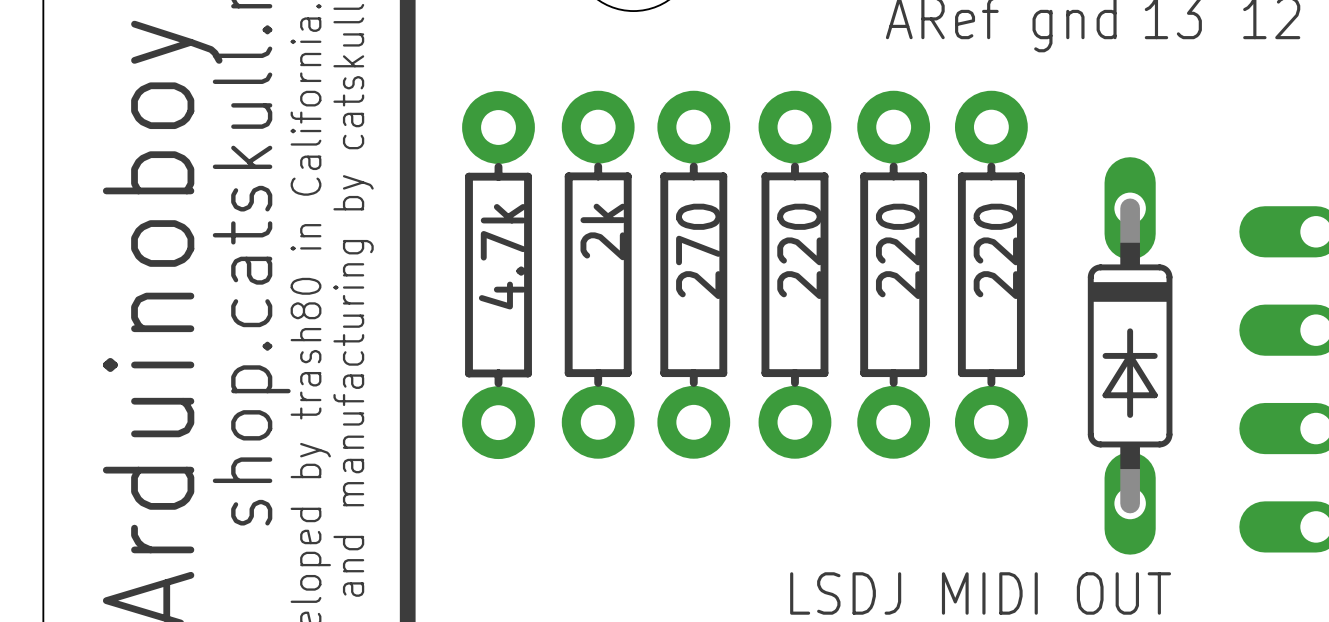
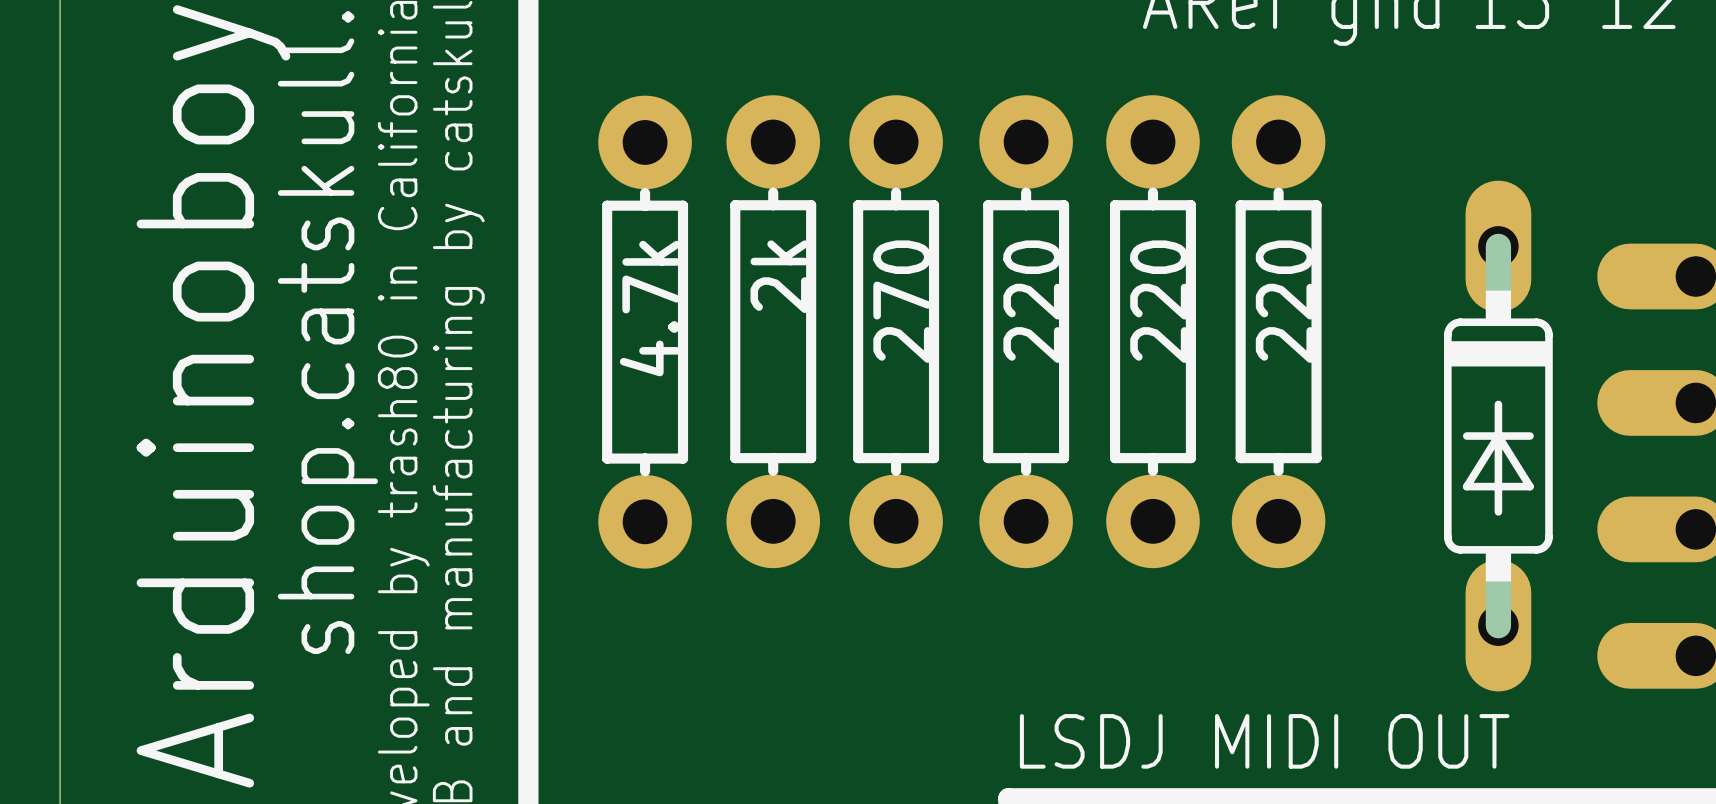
part position: (1130, 355) -> (1498, 436)

